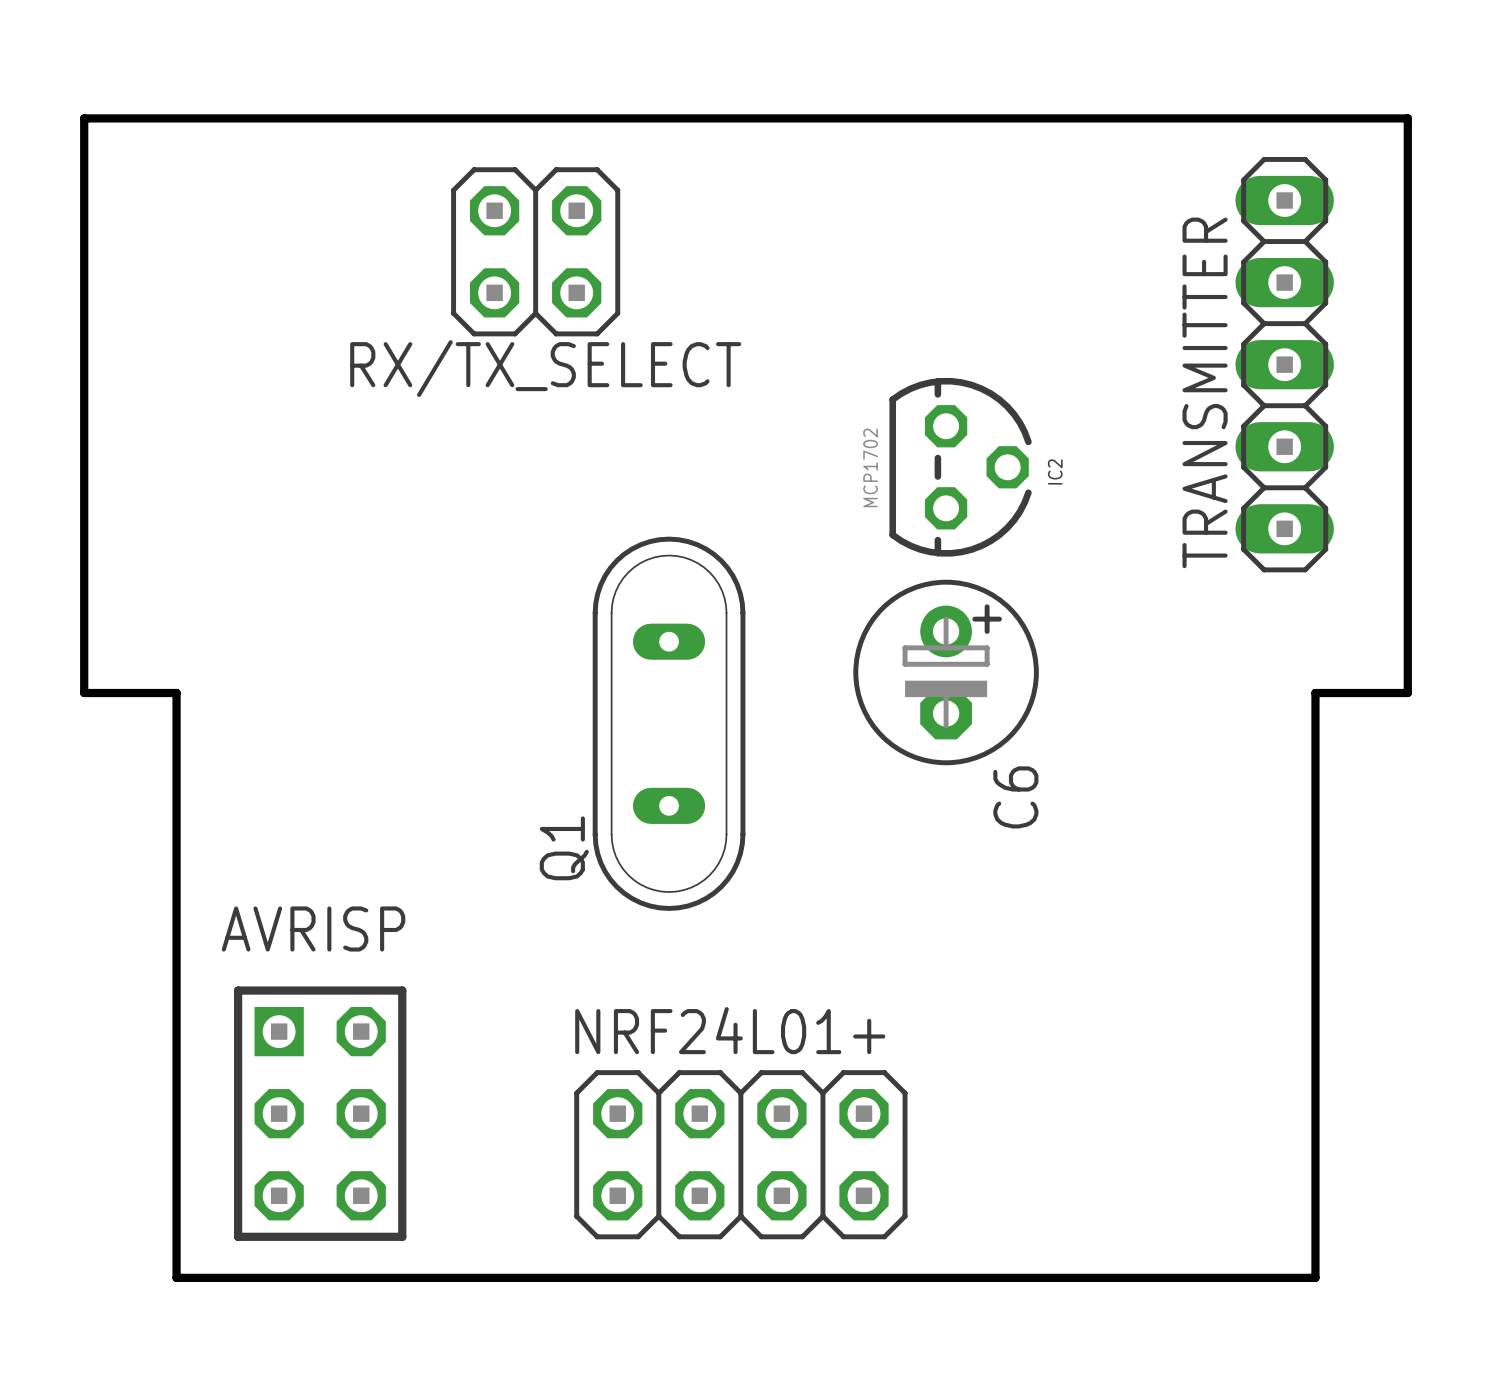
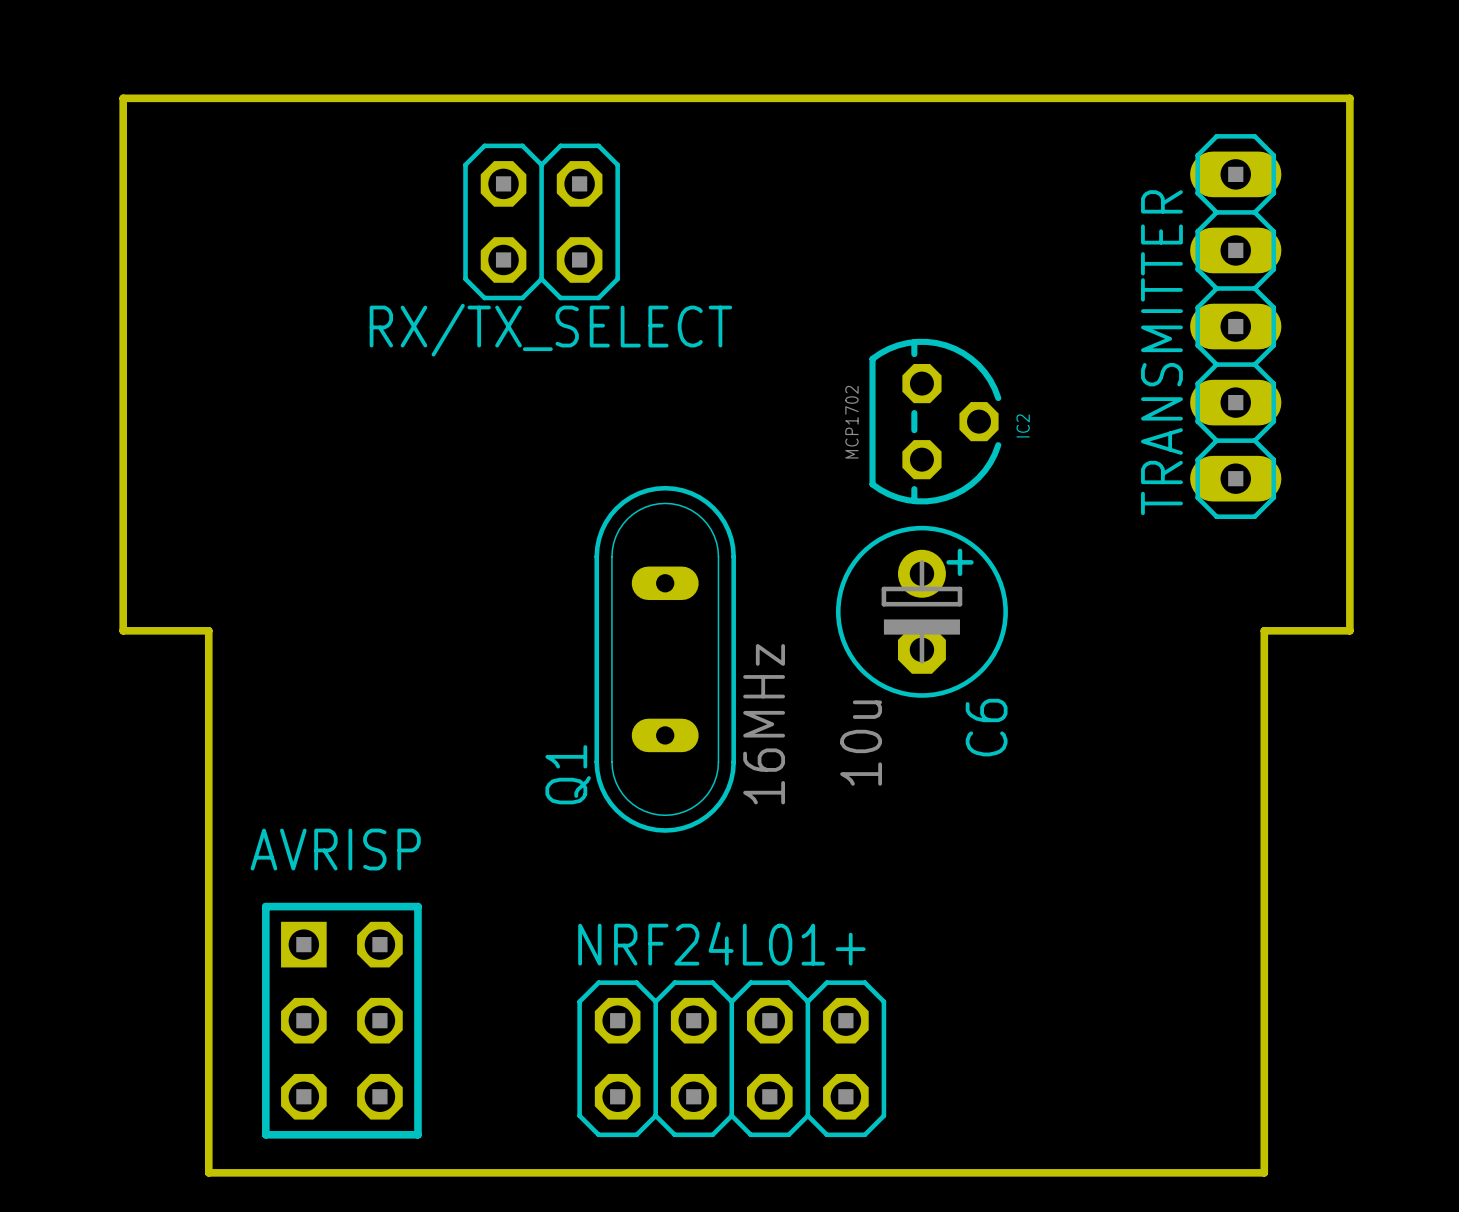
Q1 value: none -> 16MHz (764, 724)
C6 value: none -> 10u (861, 743)

